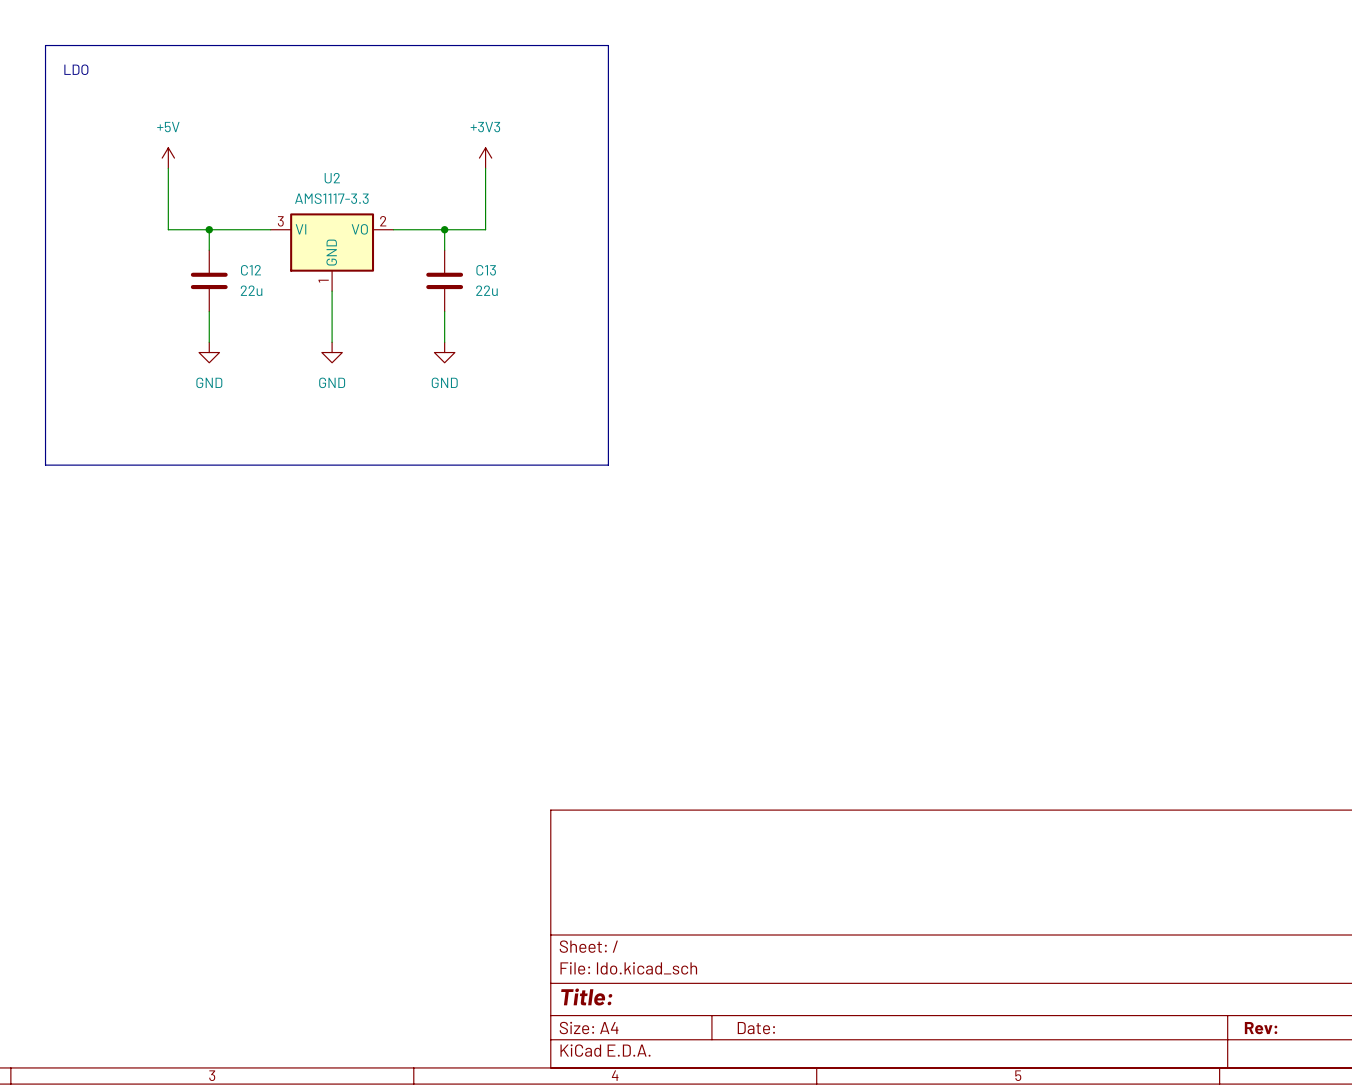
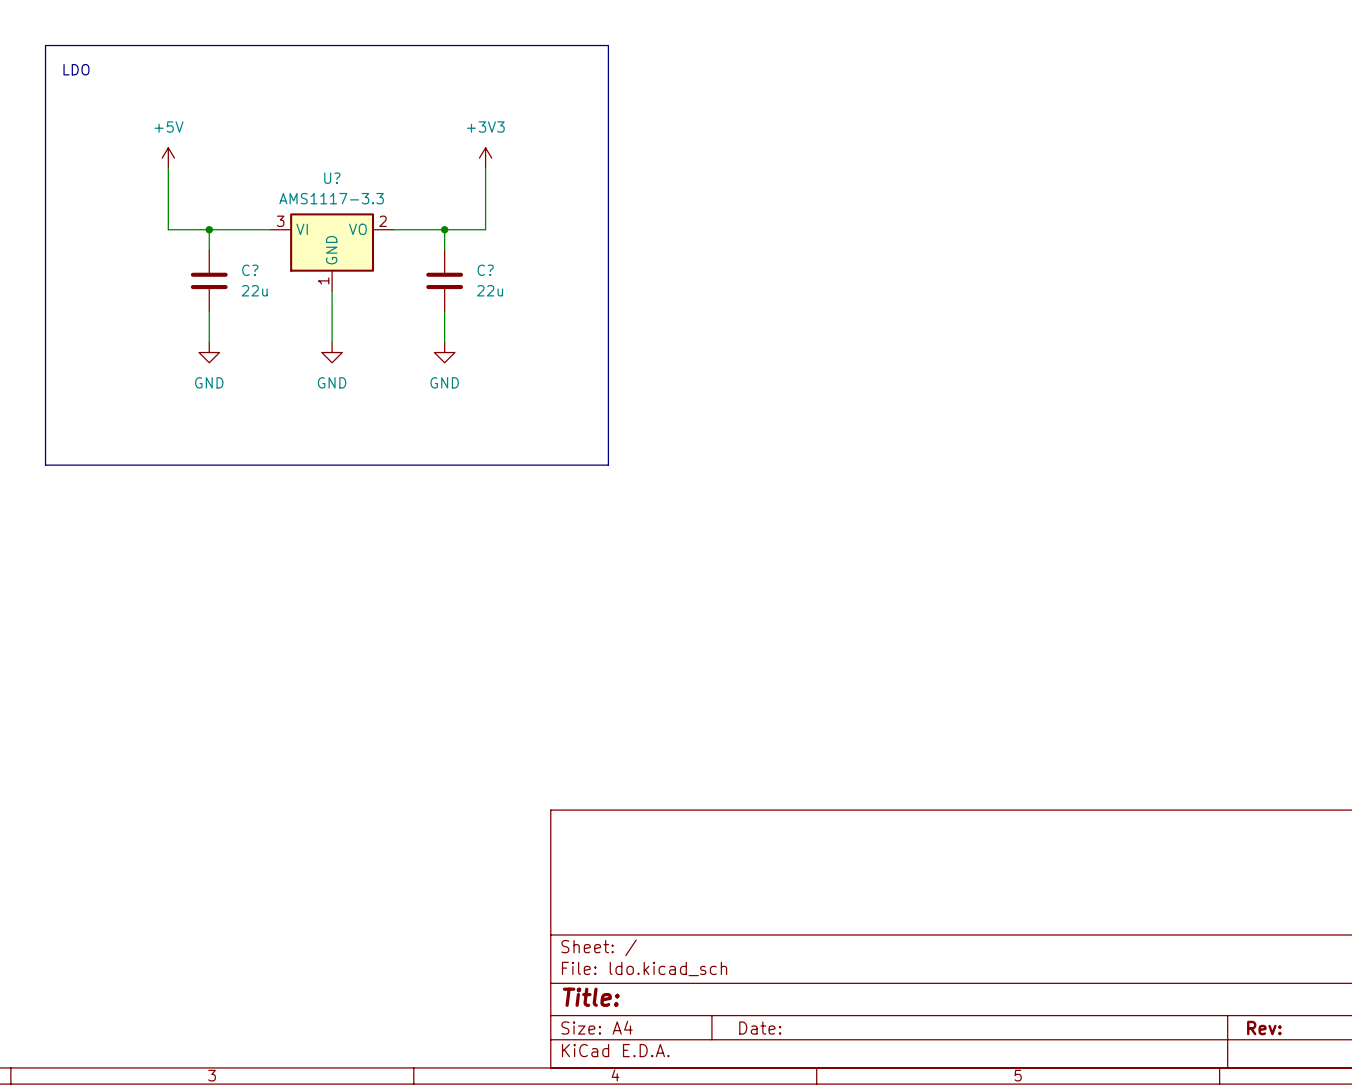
U2 name: U2 (332, 178) -> U? (332, 178)
C12 name: C12 (250, 270) -> C? (250, 270)
C13 name: C13 (486, 270) -> C? (485, 270)

